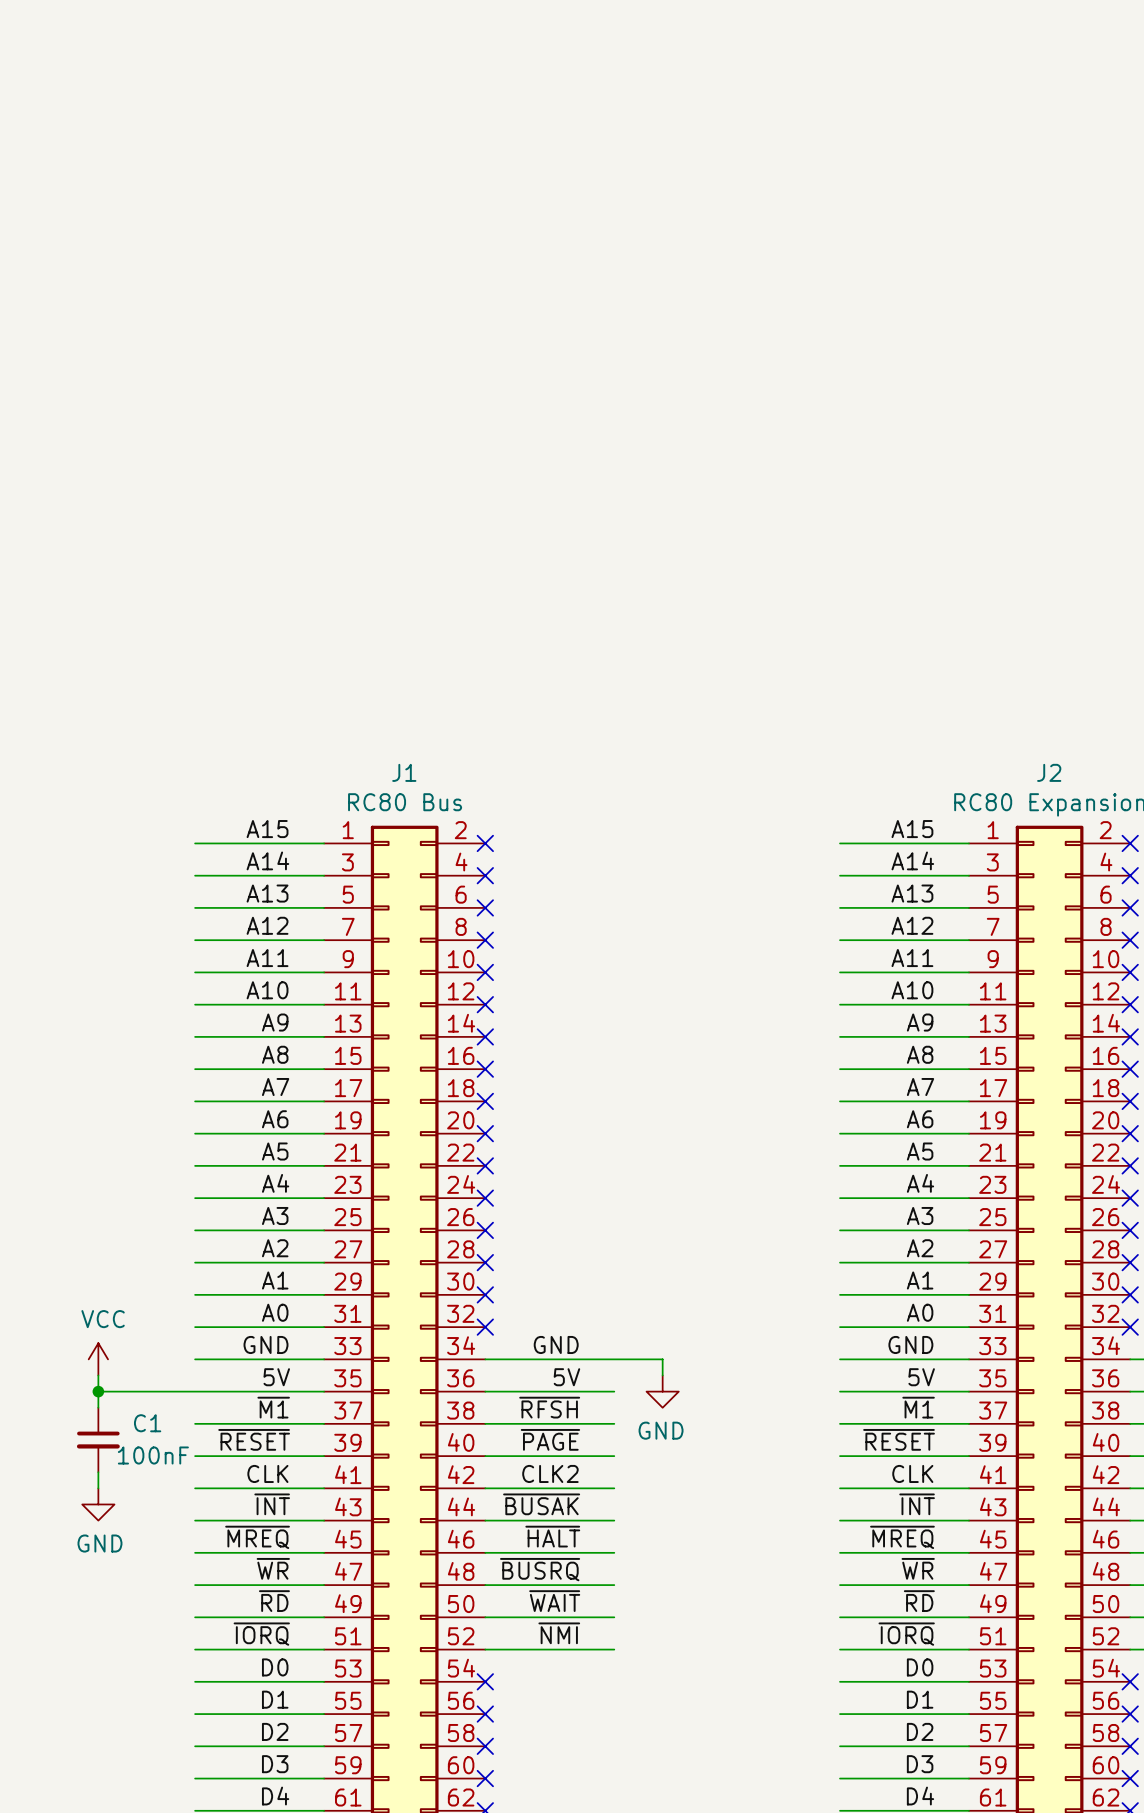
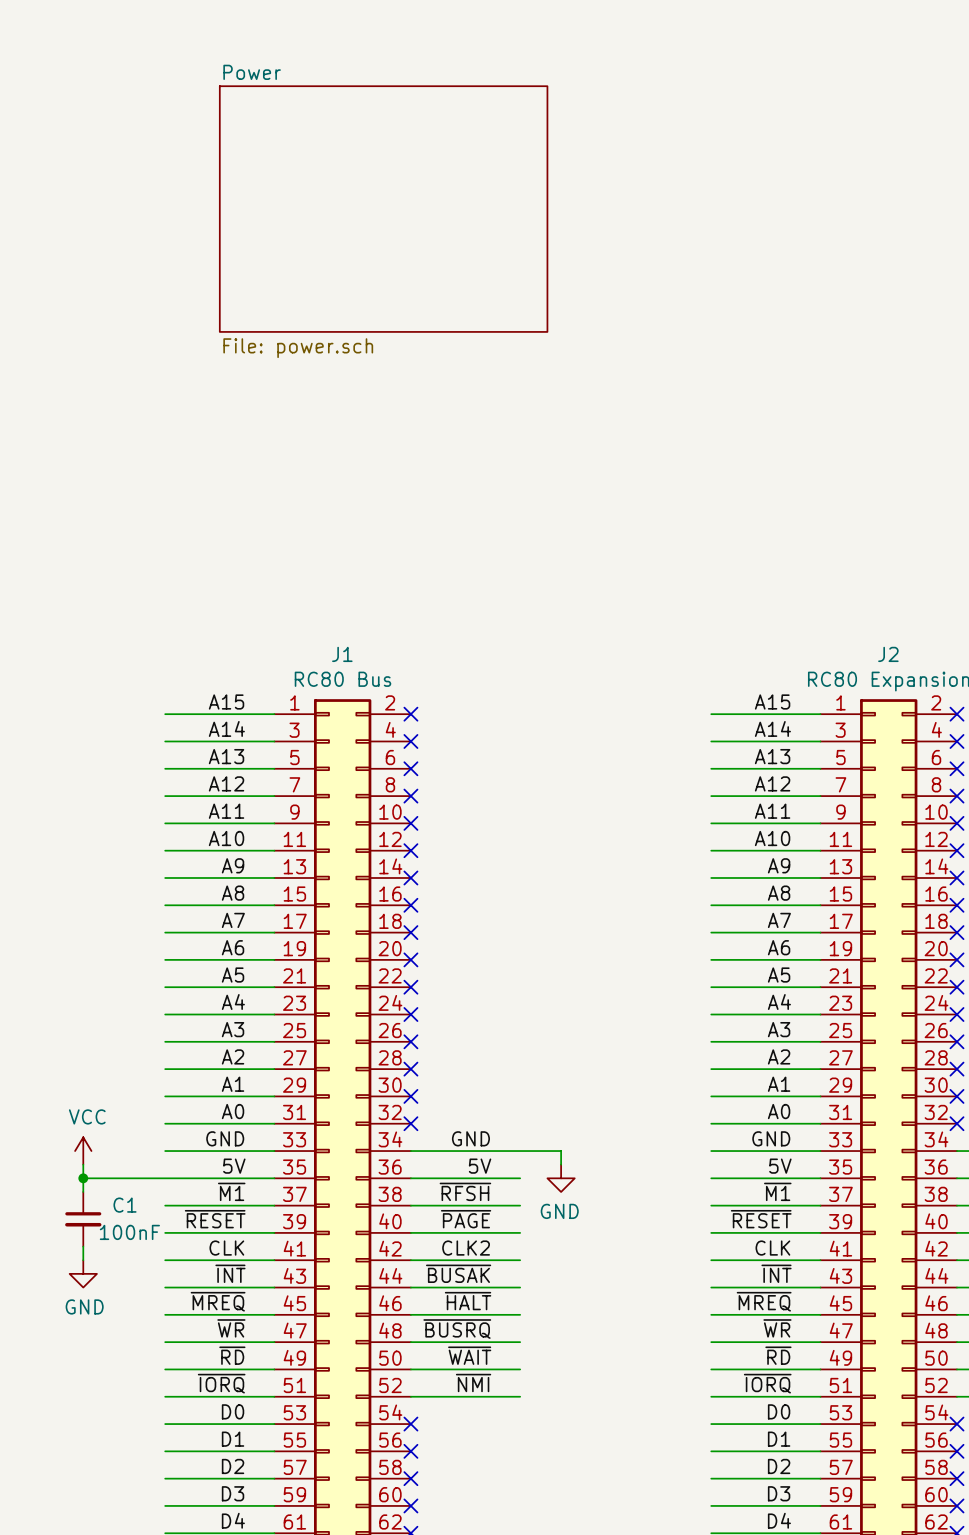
sheet Power: none -> File: power.sch (383, 209)

